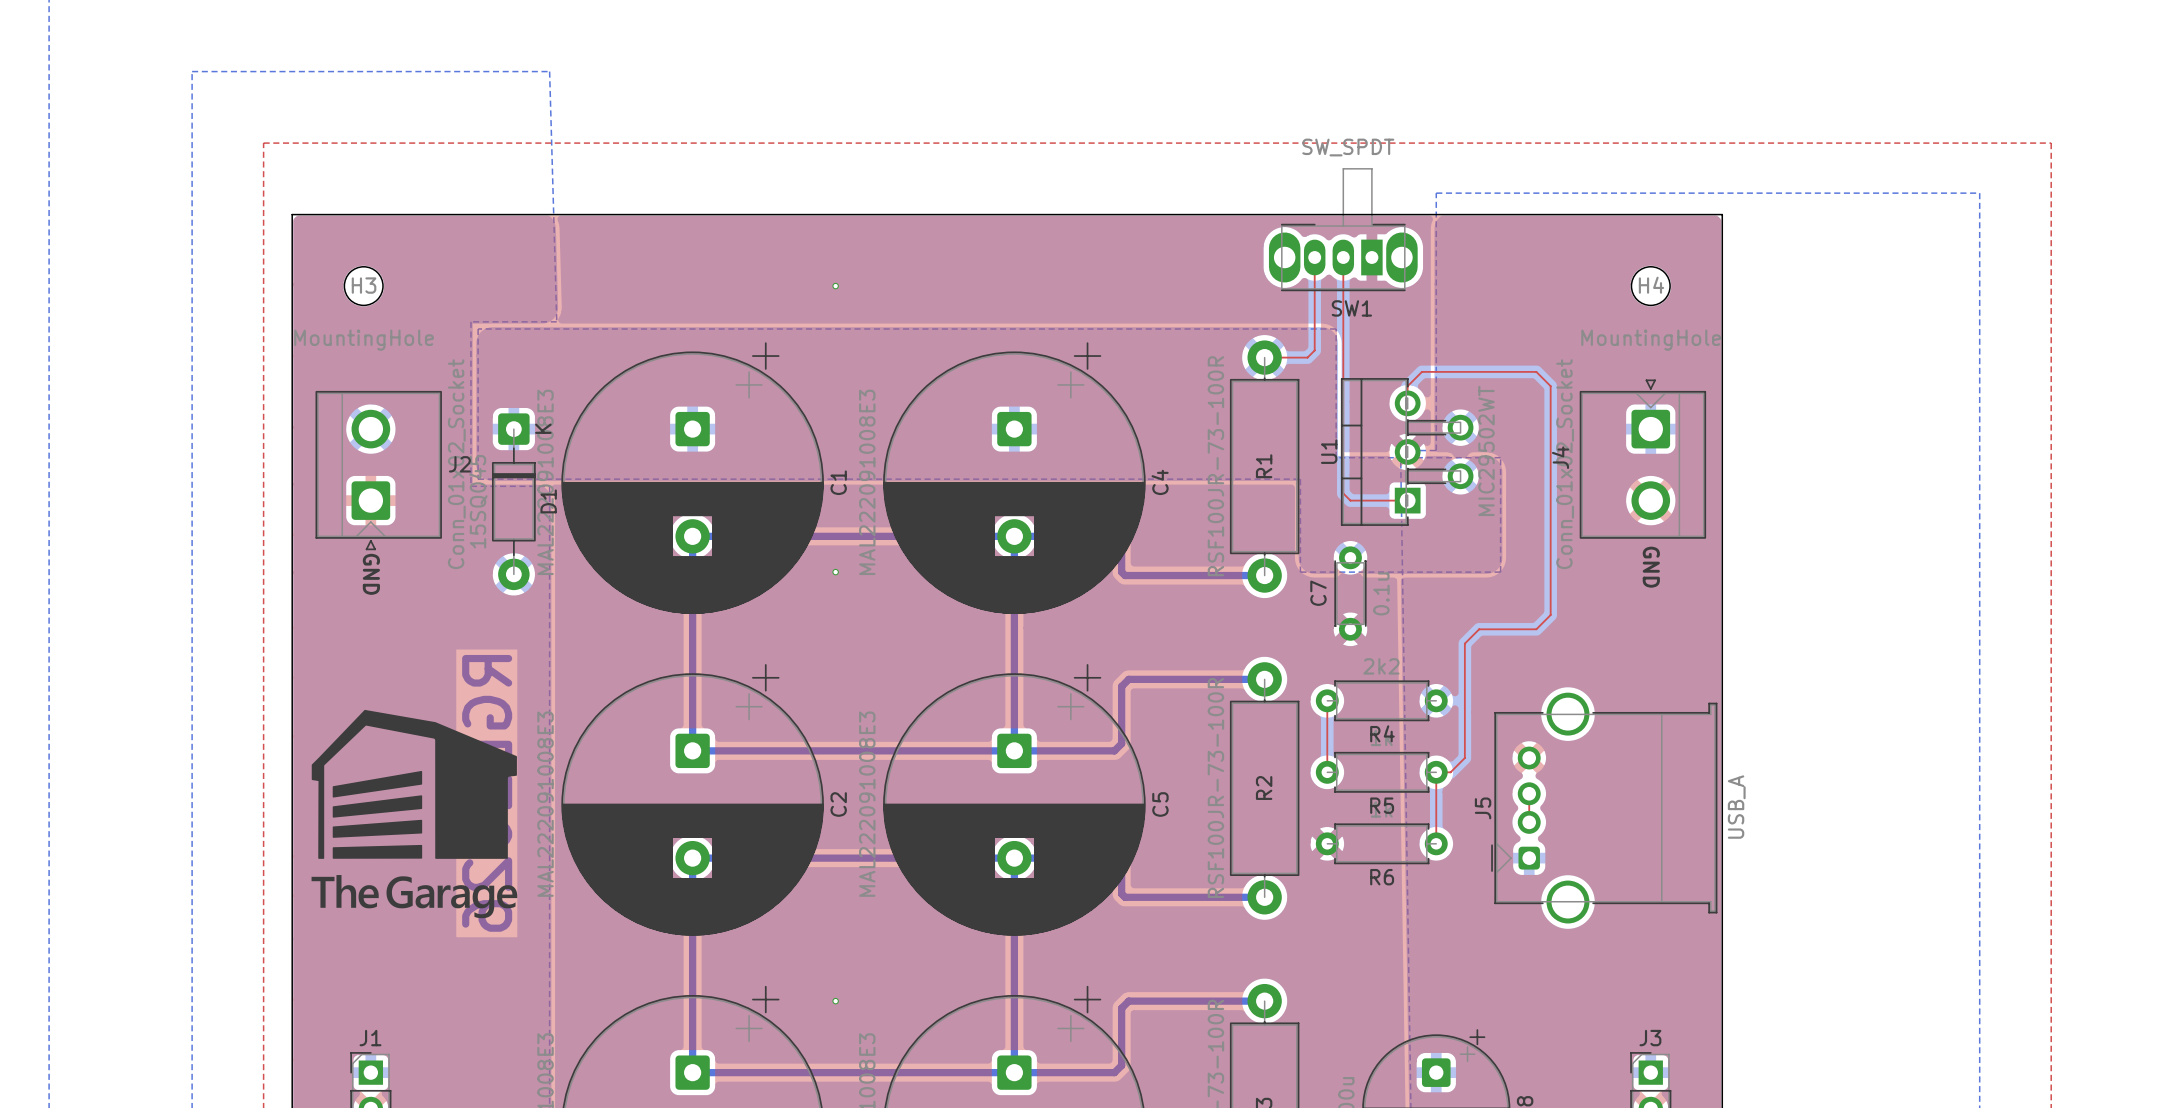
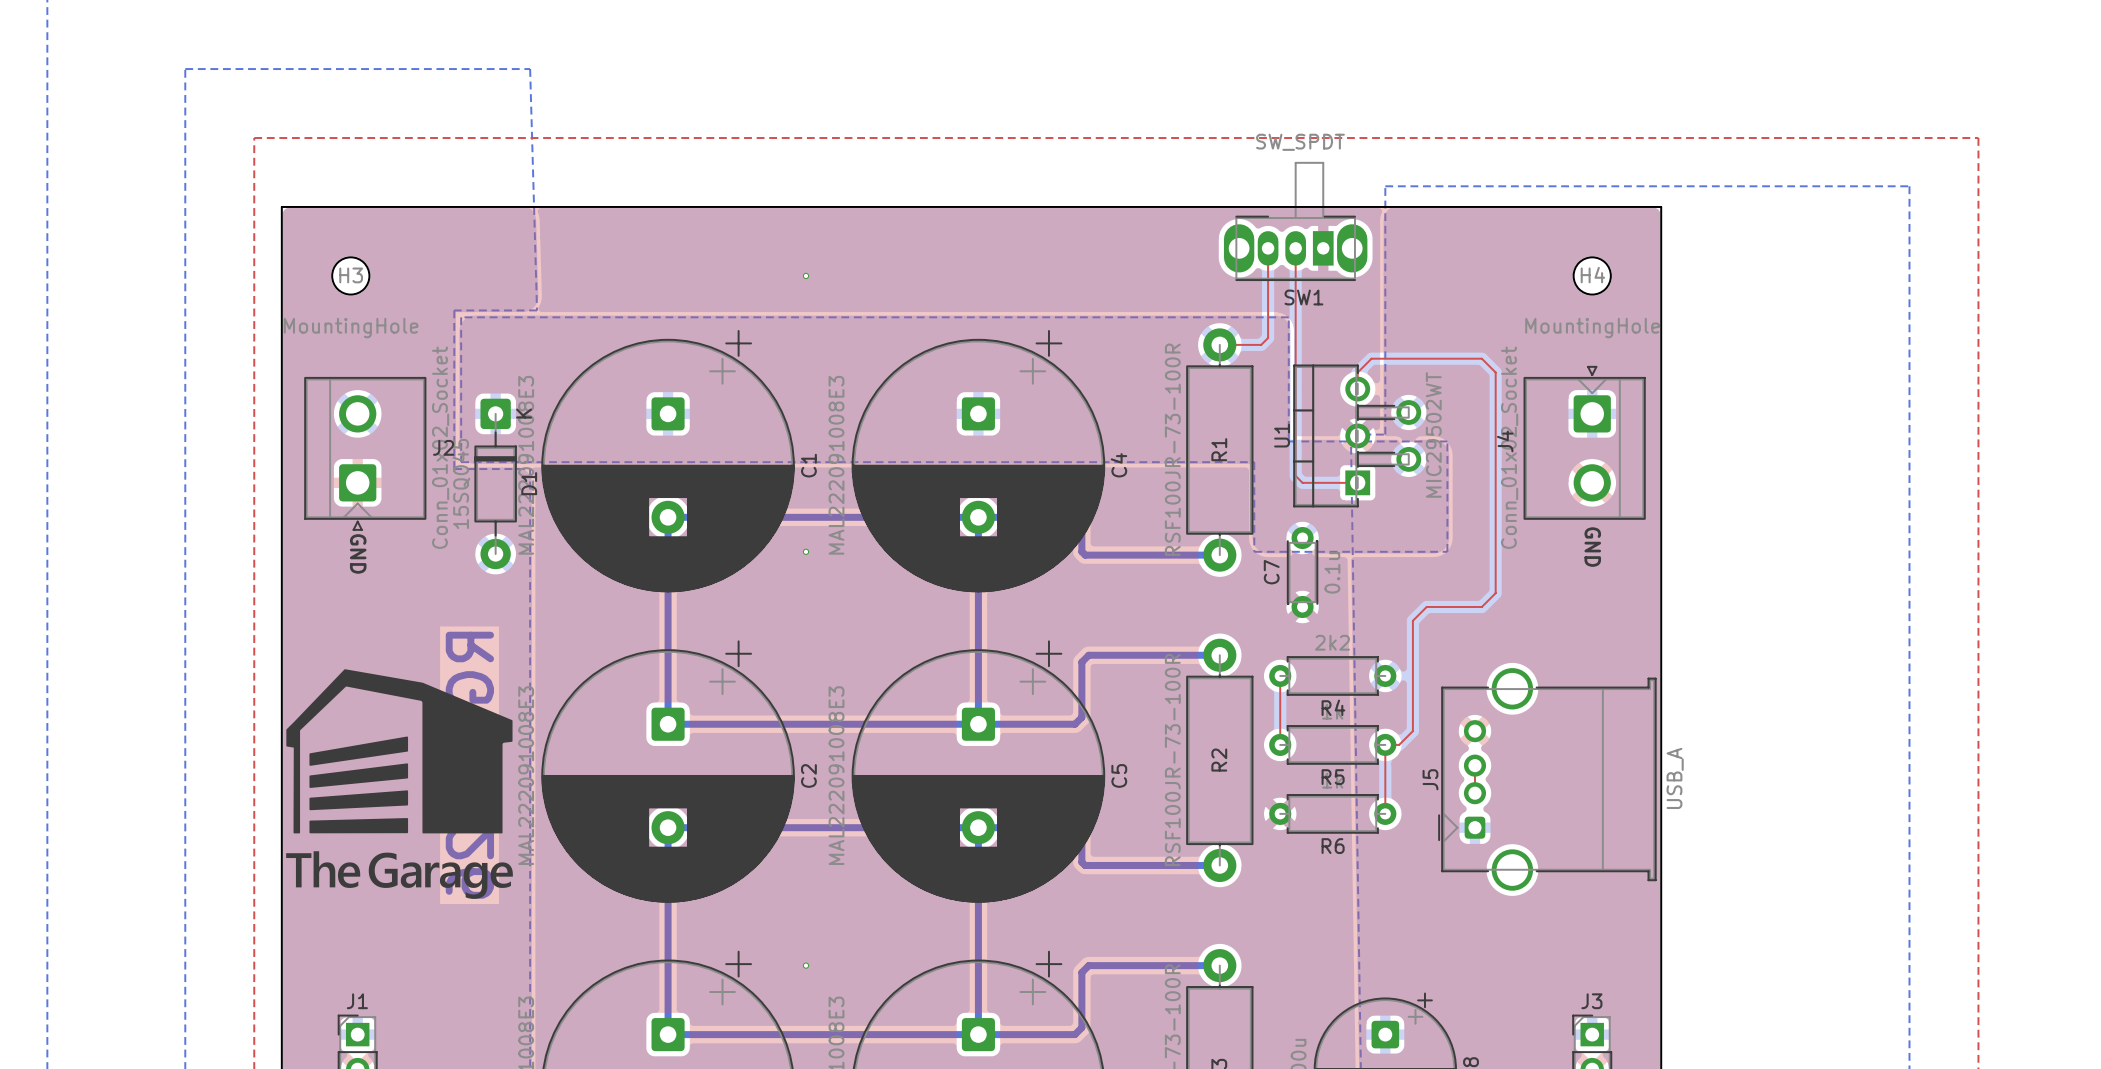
drawing shape: [311, 709, 517, 859] -> [286, 669, 513, 834]
drawing shape: [332, 770, 423, 798] -> [309, 736, 409, 766]
drawing shape: [332, 795, 423, 818] -> [309, 763, 409, 788]
drawing shape: [332, 819, 423, 838] -> [309, 790, 409, 811]
drawing shape: [332, 844, 423, 859] -> [309, 818, 409, 834]
drawing: [311, 875, 379, 909] -> none
drawing shape: [386, 876, 413, 909] -> [368, 852, 398, 888]
drawing: none -> [286, 851, 361, 888]
drawing shape: [415, 885, 435, 909] -> [400, 862, 422, 888]
drawing: [437, 885, 518, 919] -> none
drawing: none -> [425, 862, 513, 899]

